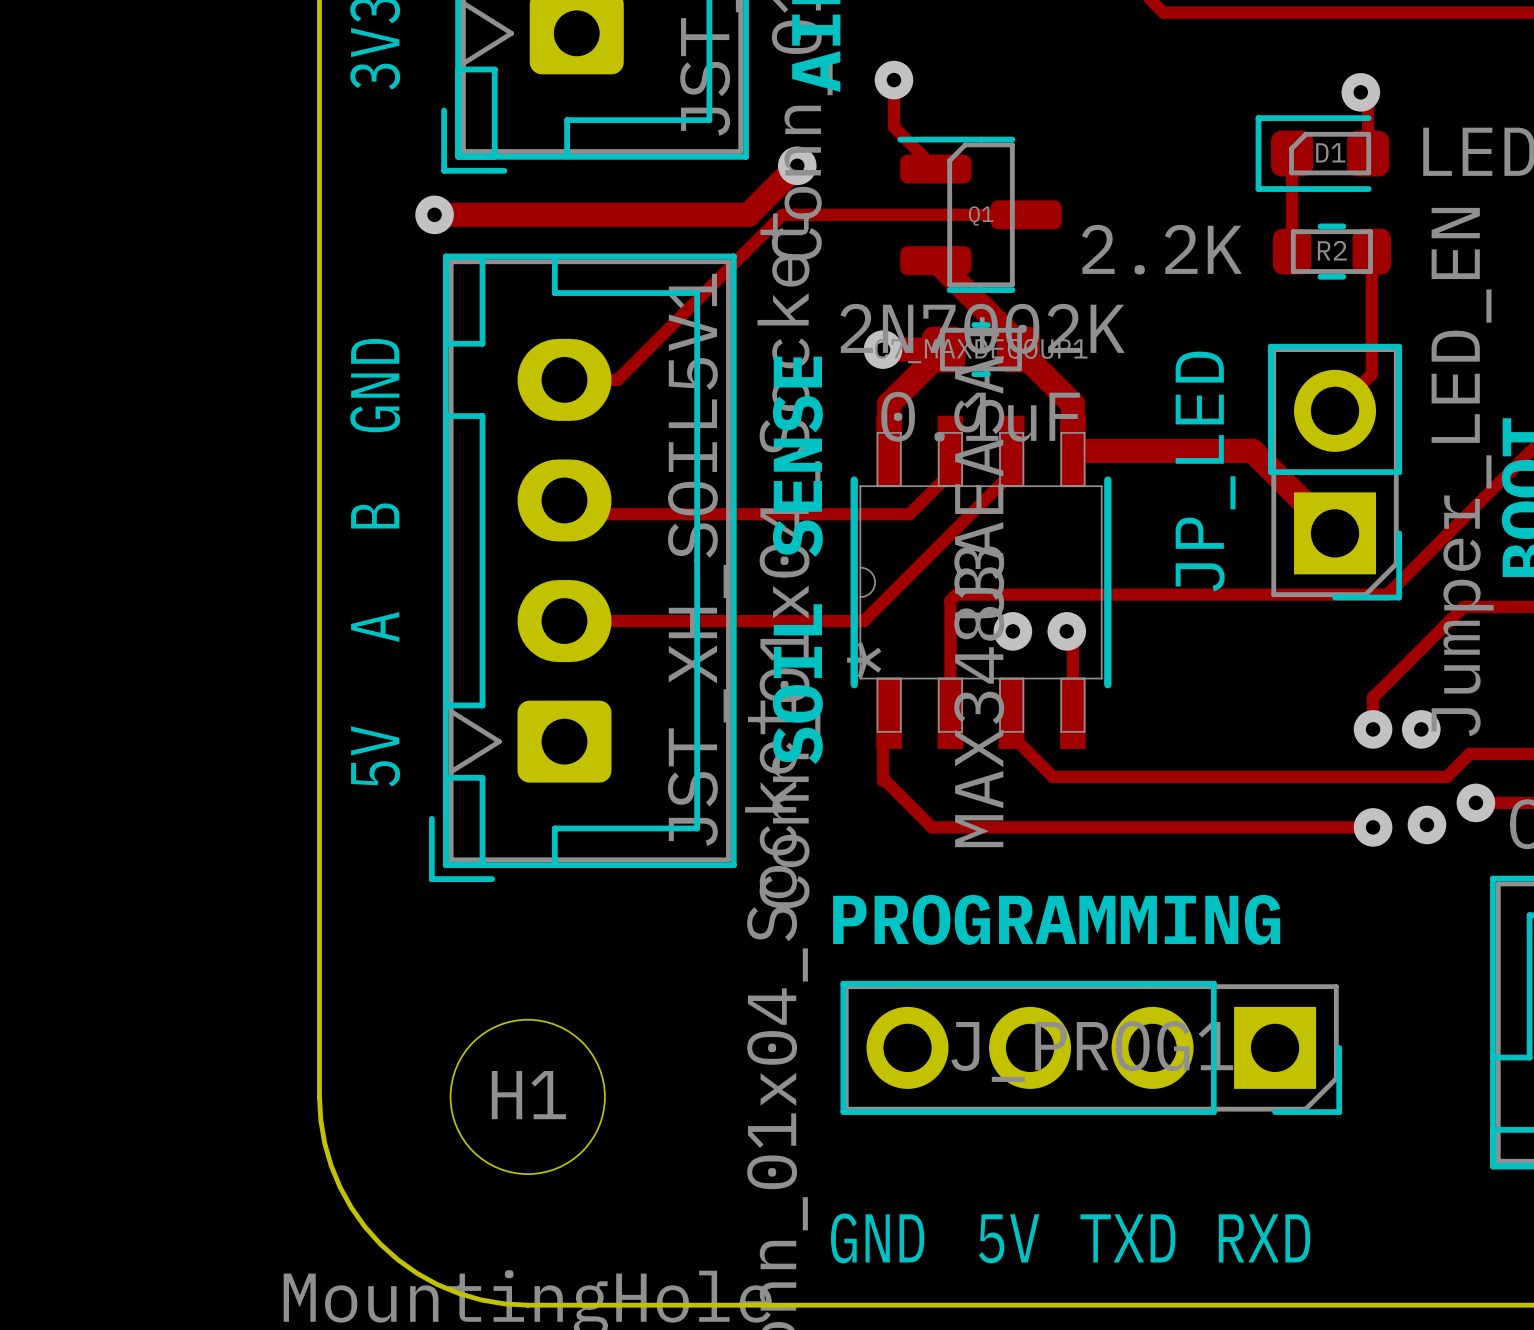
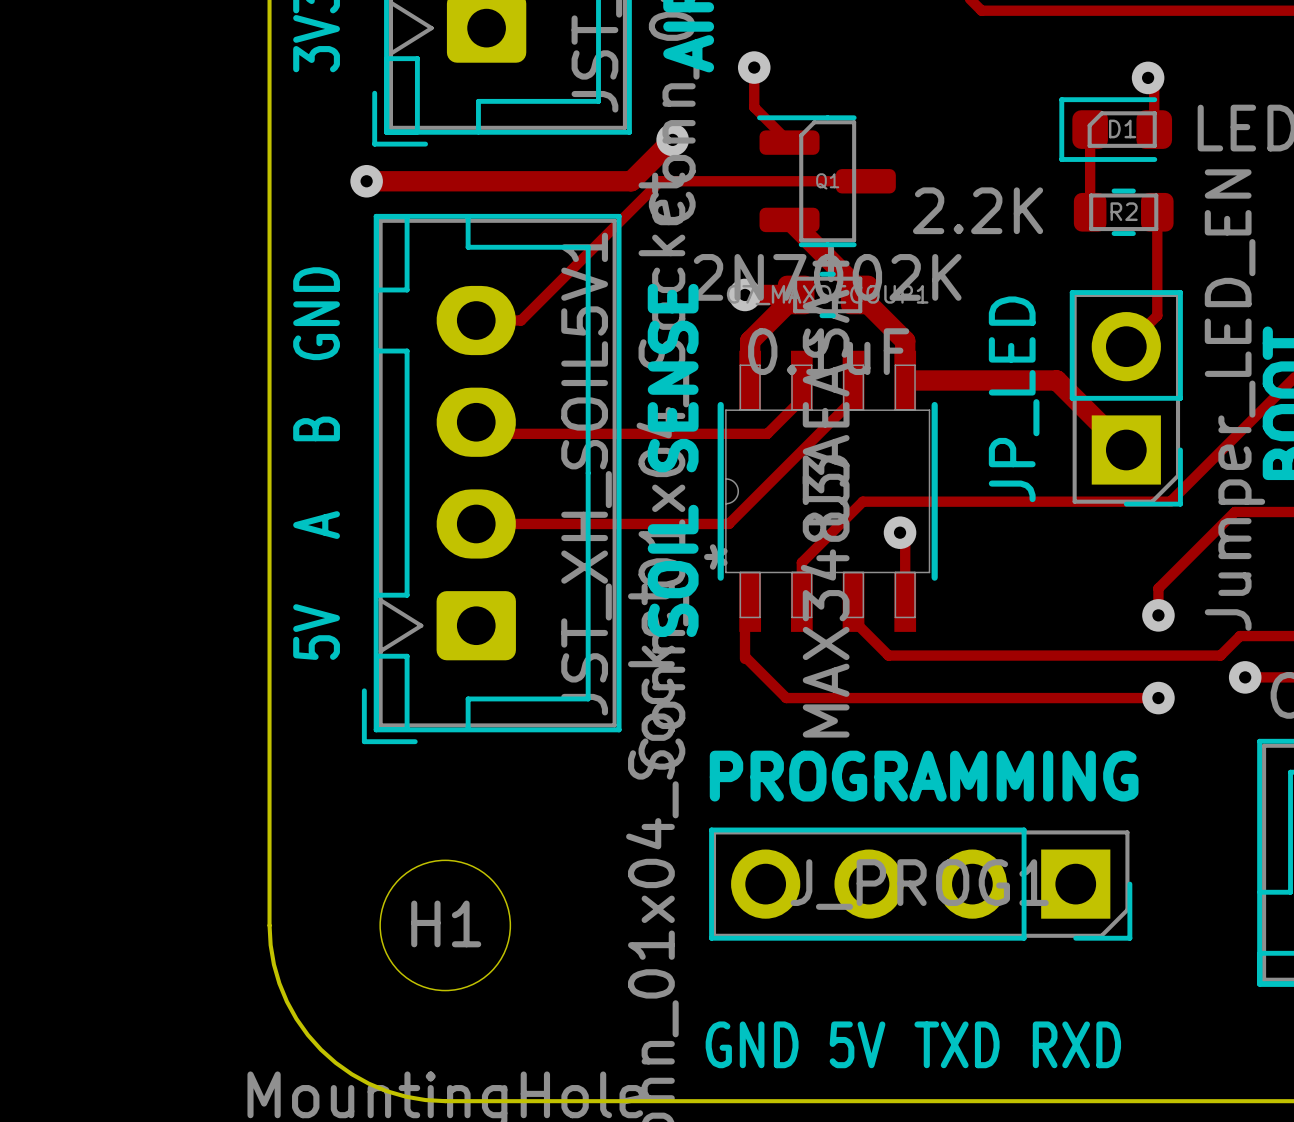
track: (1022, 594) (956, 594) (950, 600) (950, 666) -> (862, 501) (801, 562)
via: (1012, 631) -> none
via: (1421, 729) -> none
via: (1426, 824) -> none

